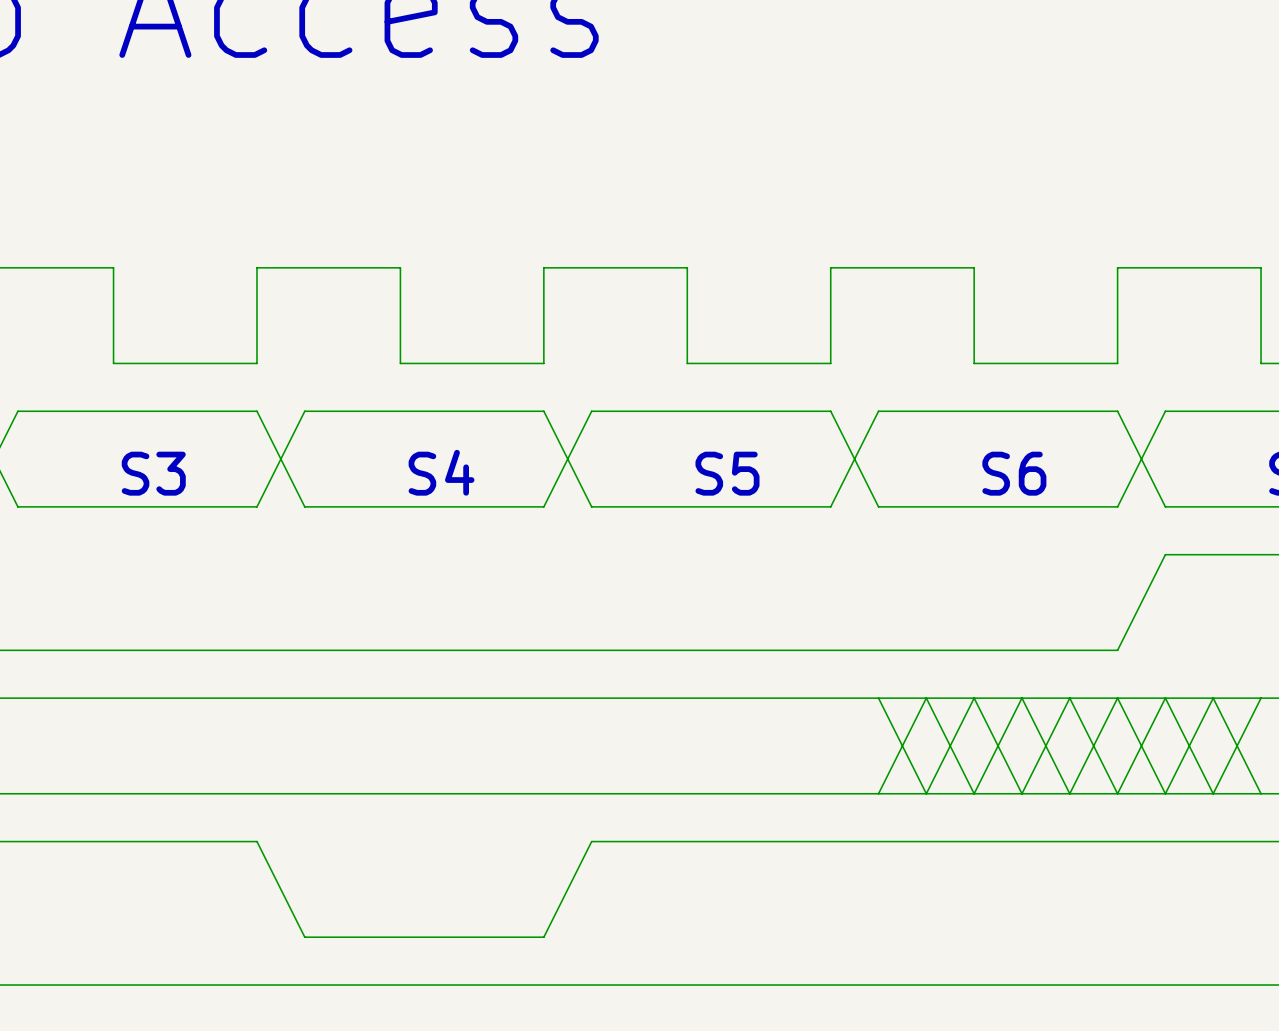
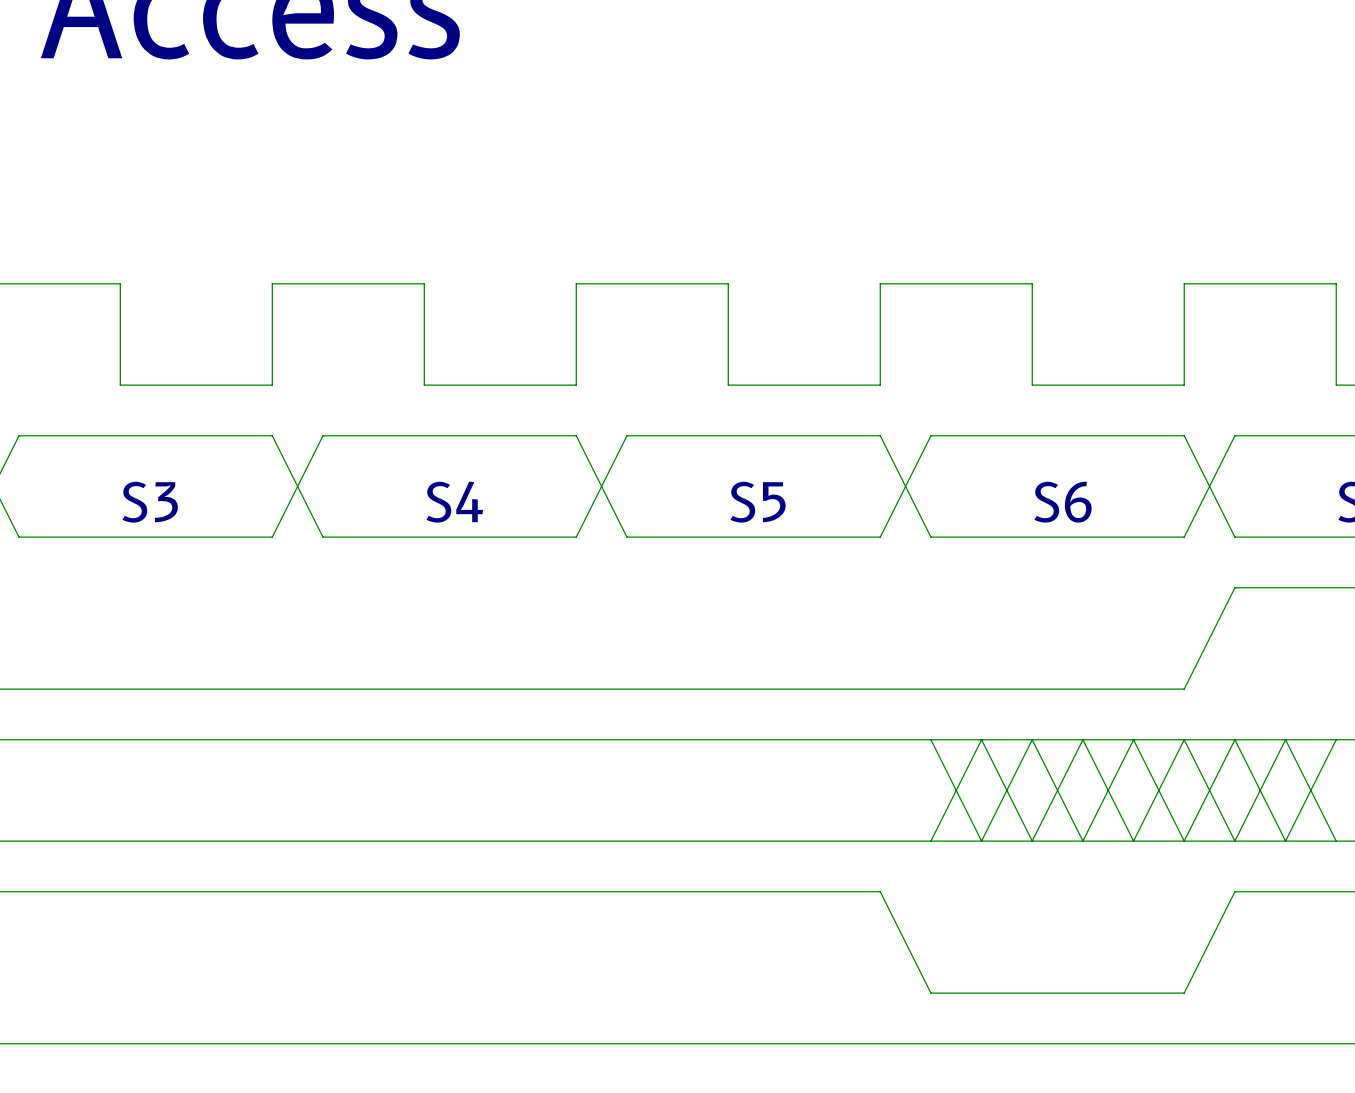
wire: (256, 841) (304, 937) (543, 937) (591, 841) -> (272, 891) (626, 891)
wire: (830, 841) (1165, 841) -> (880, 891) (930, 993) (1184, 993) (1234, 891)

